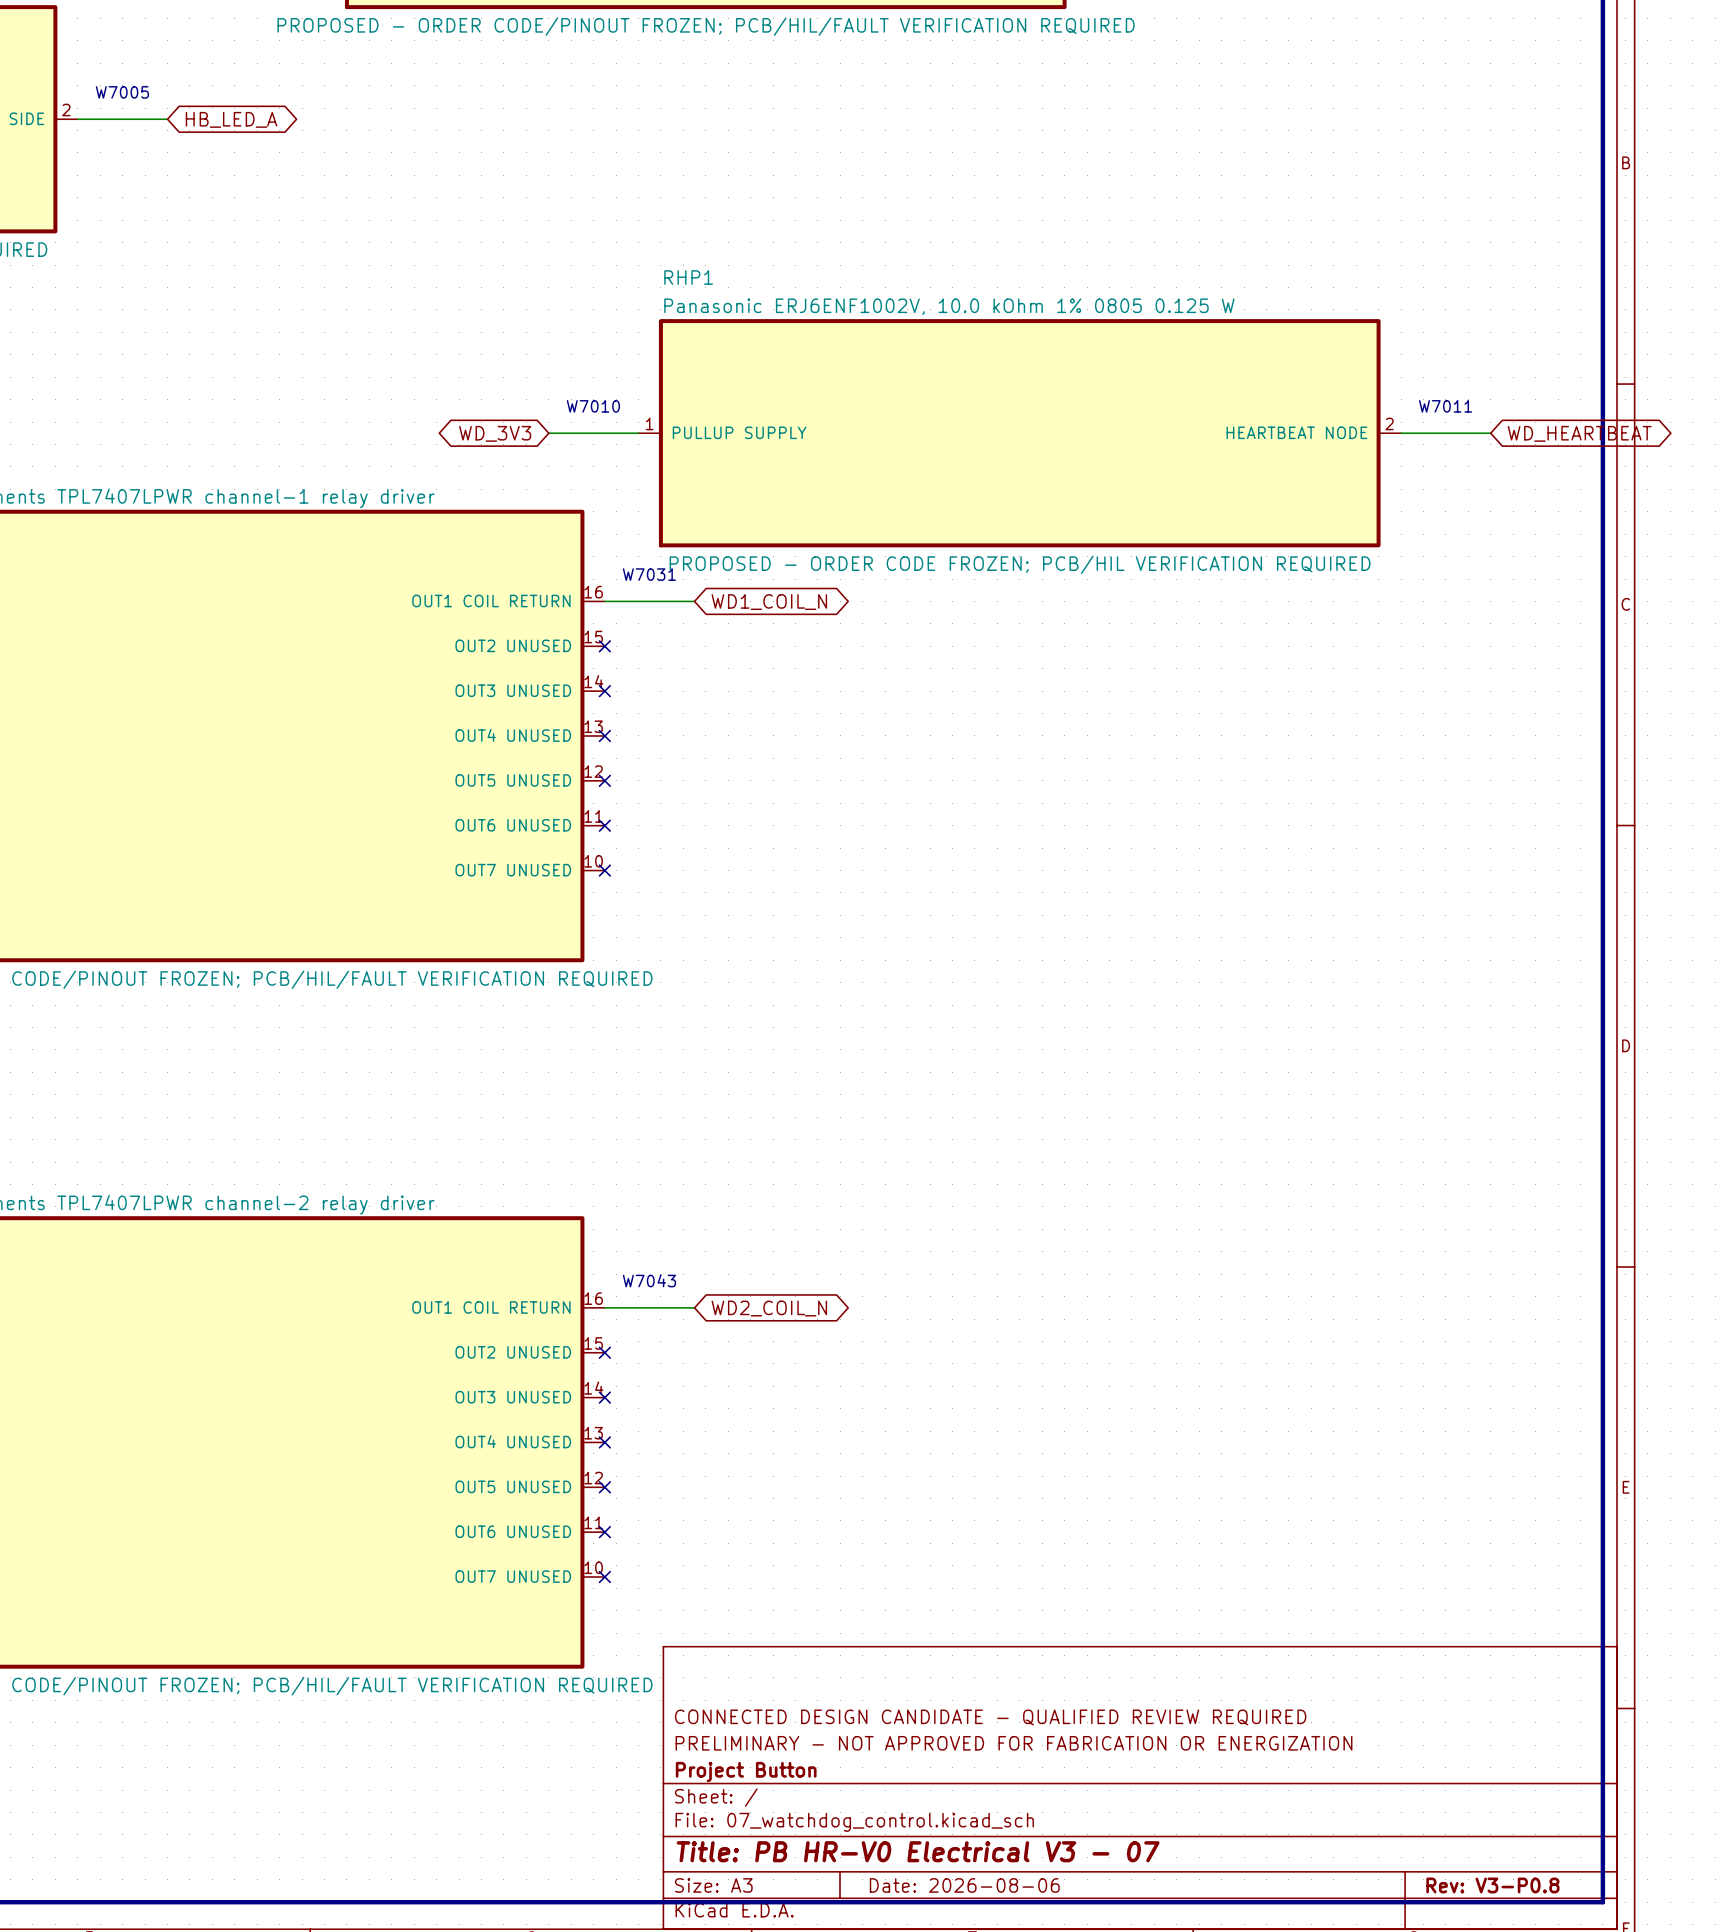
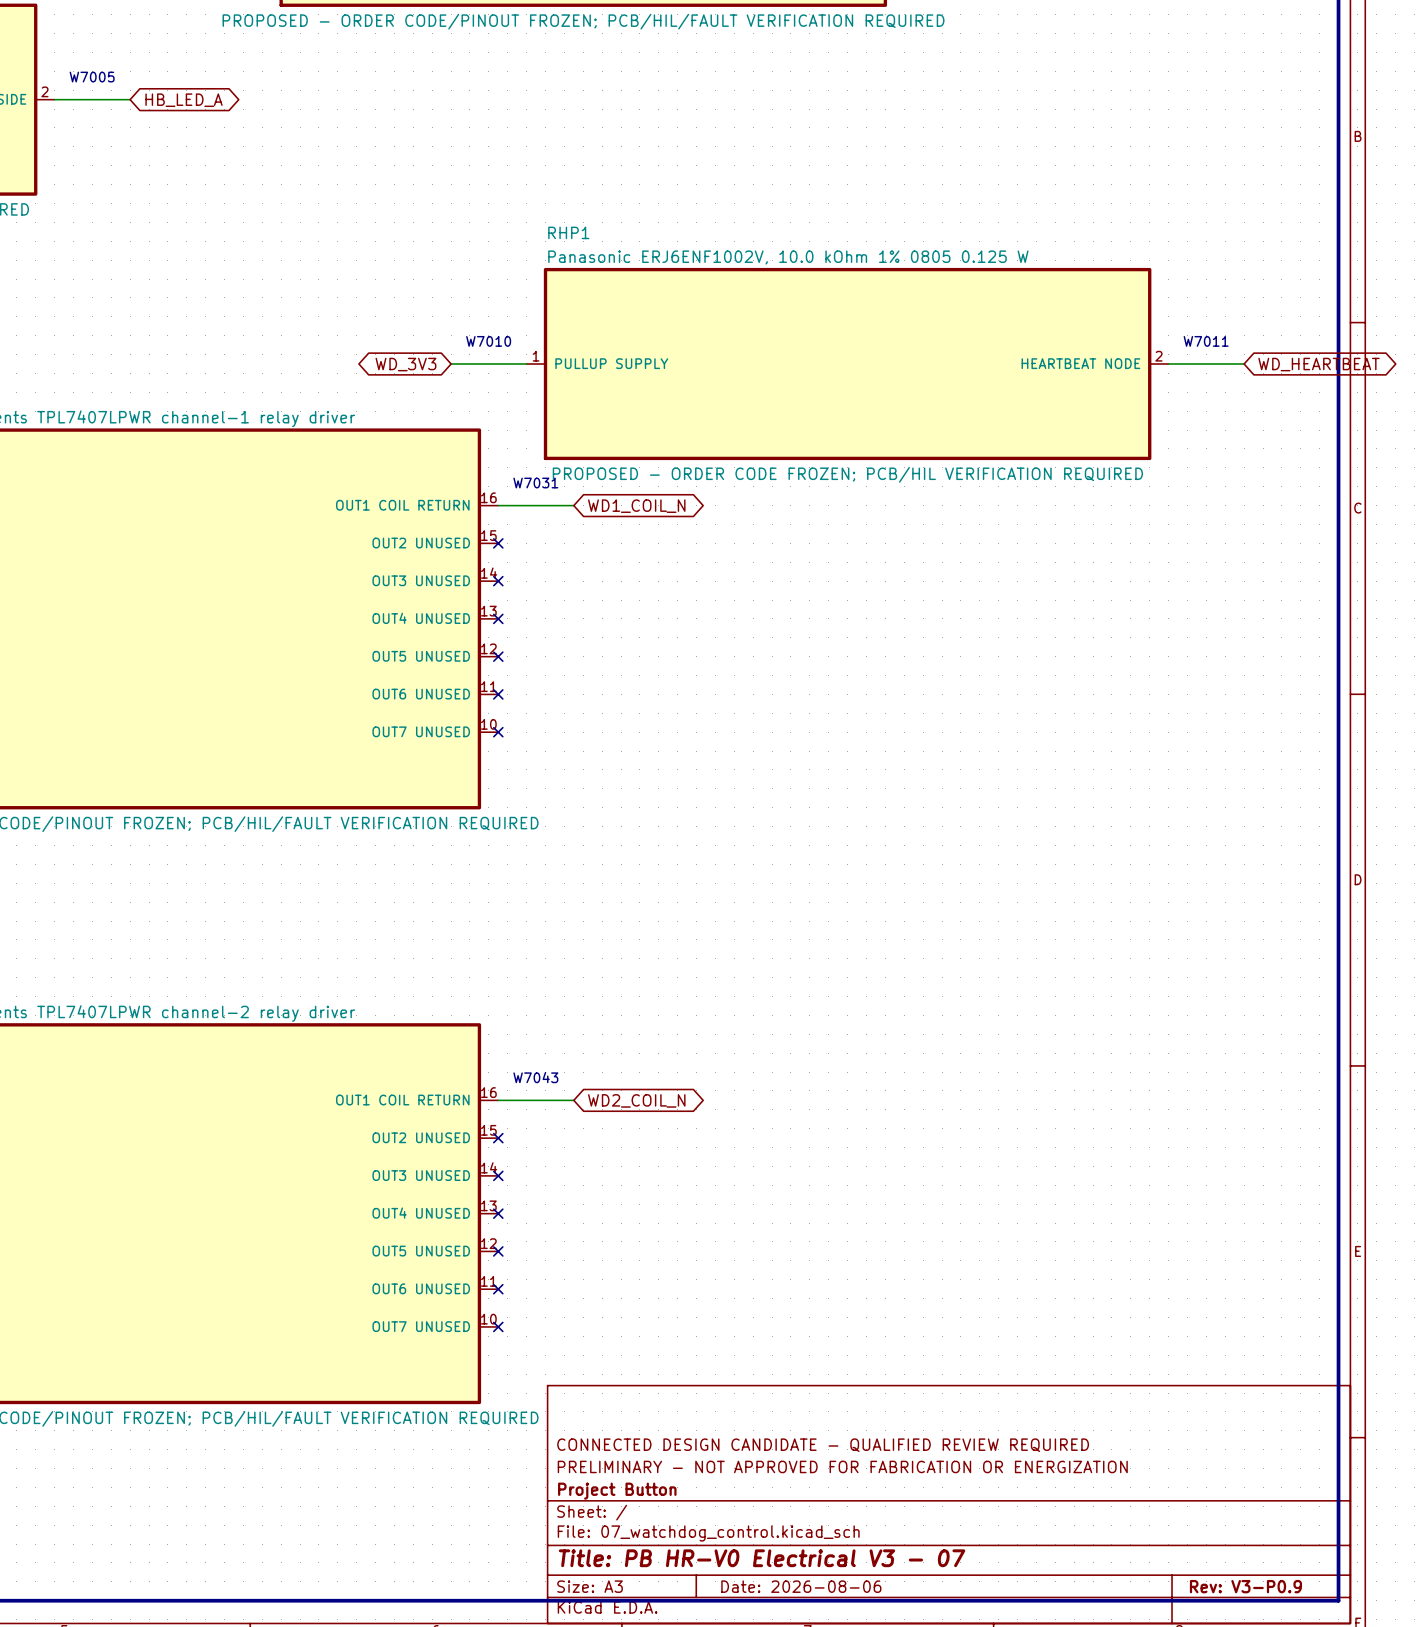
title block: Rev: V3-P0.8 (1492, 1885) -> Rev: V3-P0.9 (1245, 1586)

